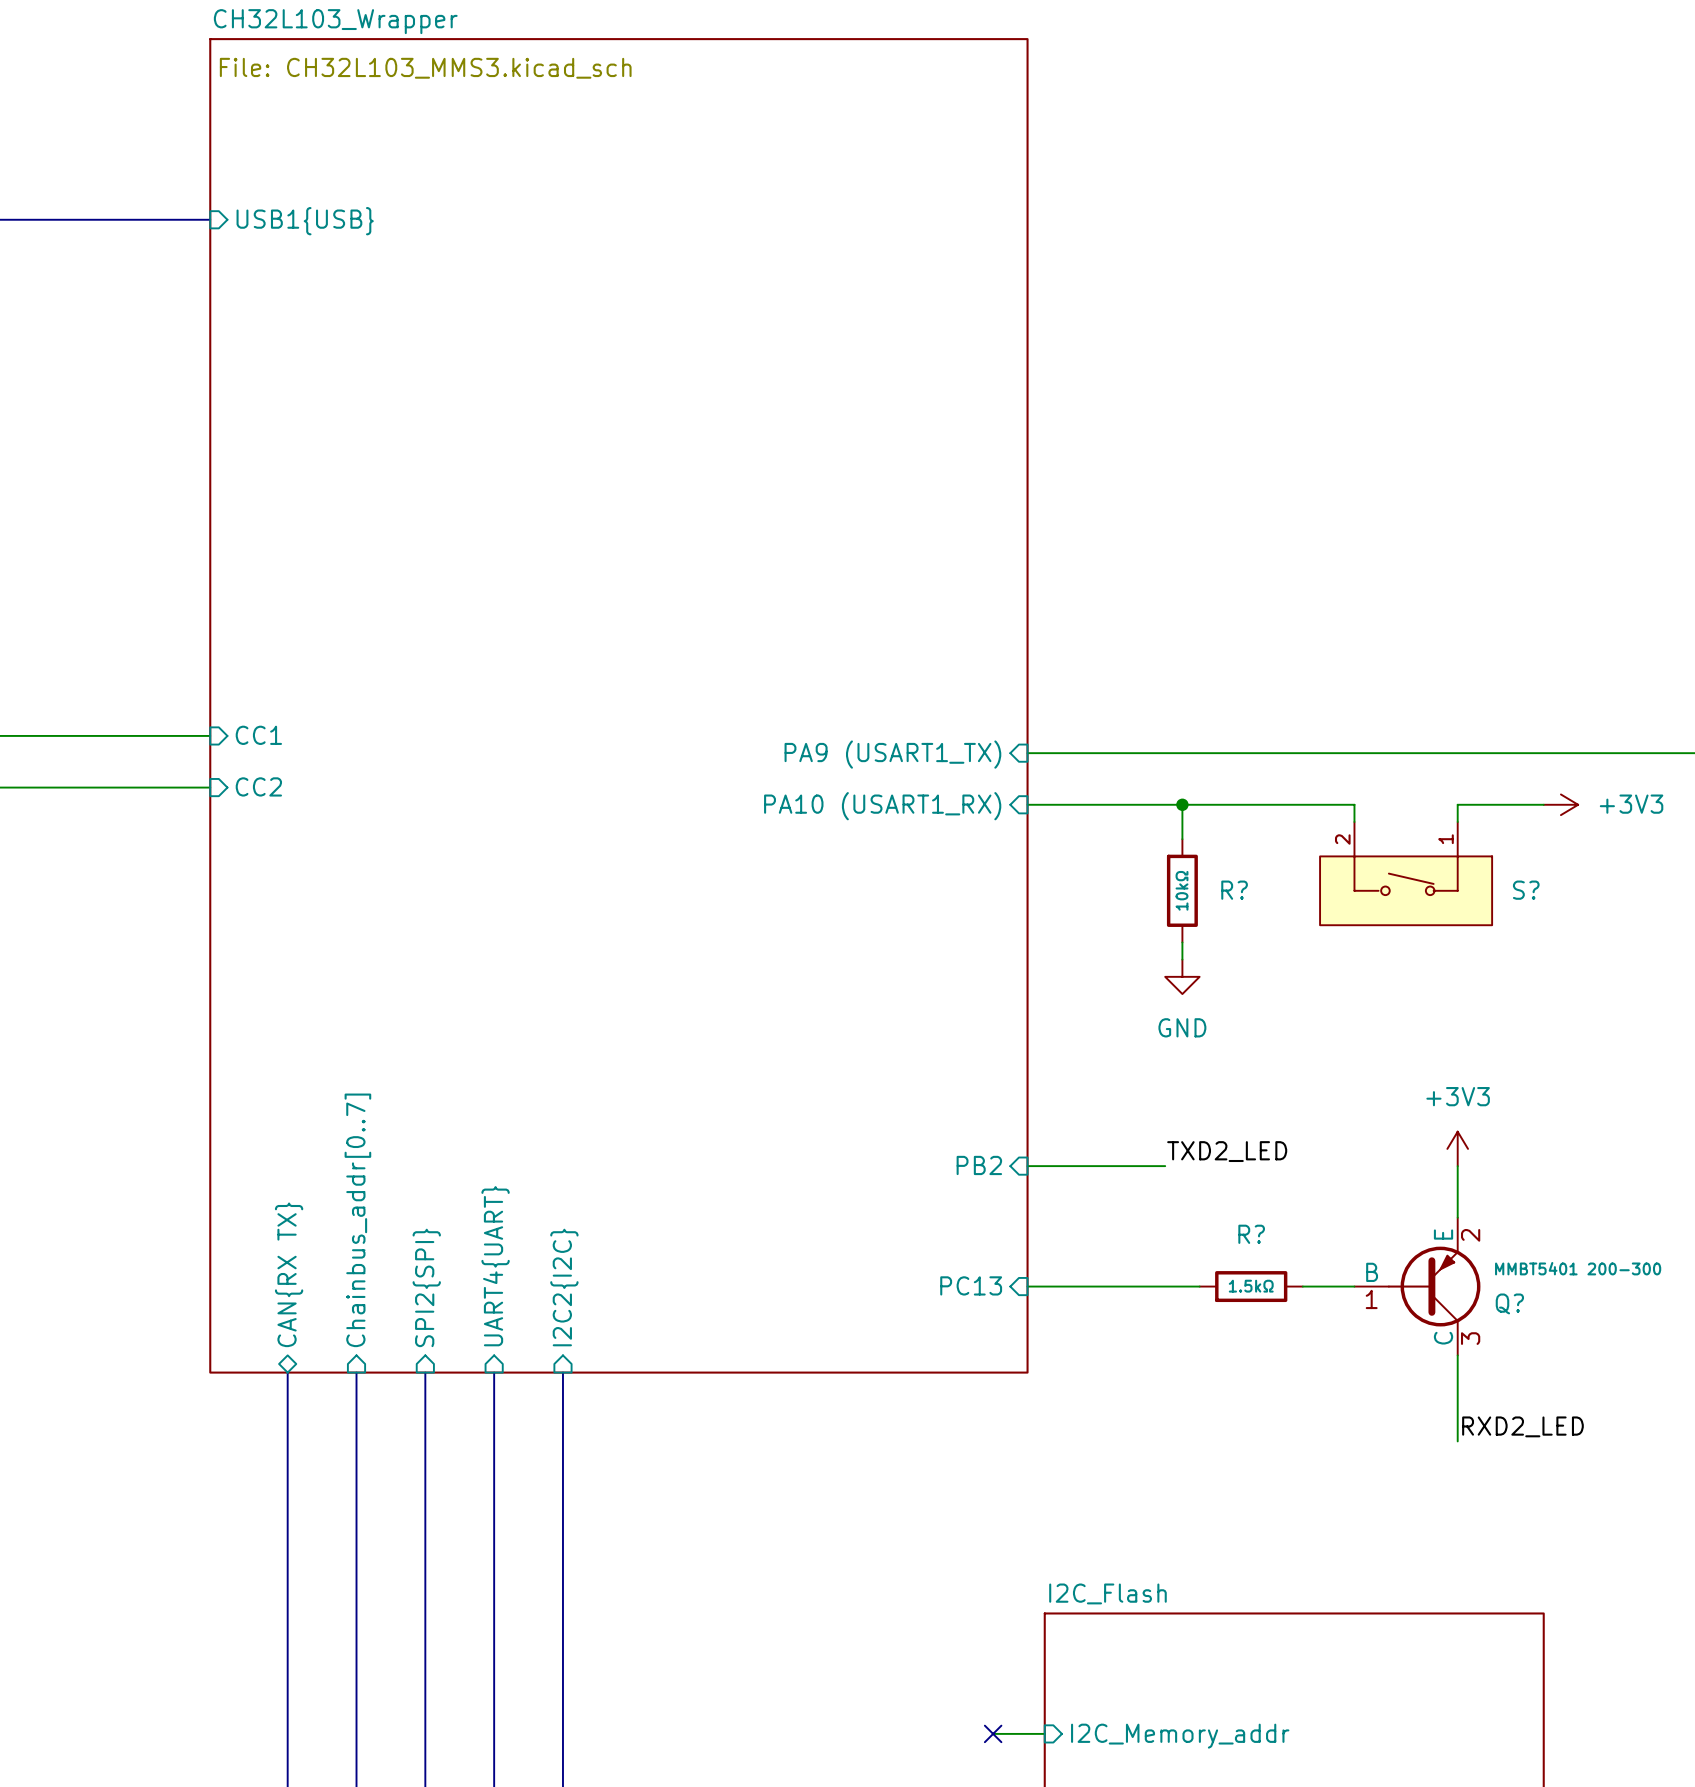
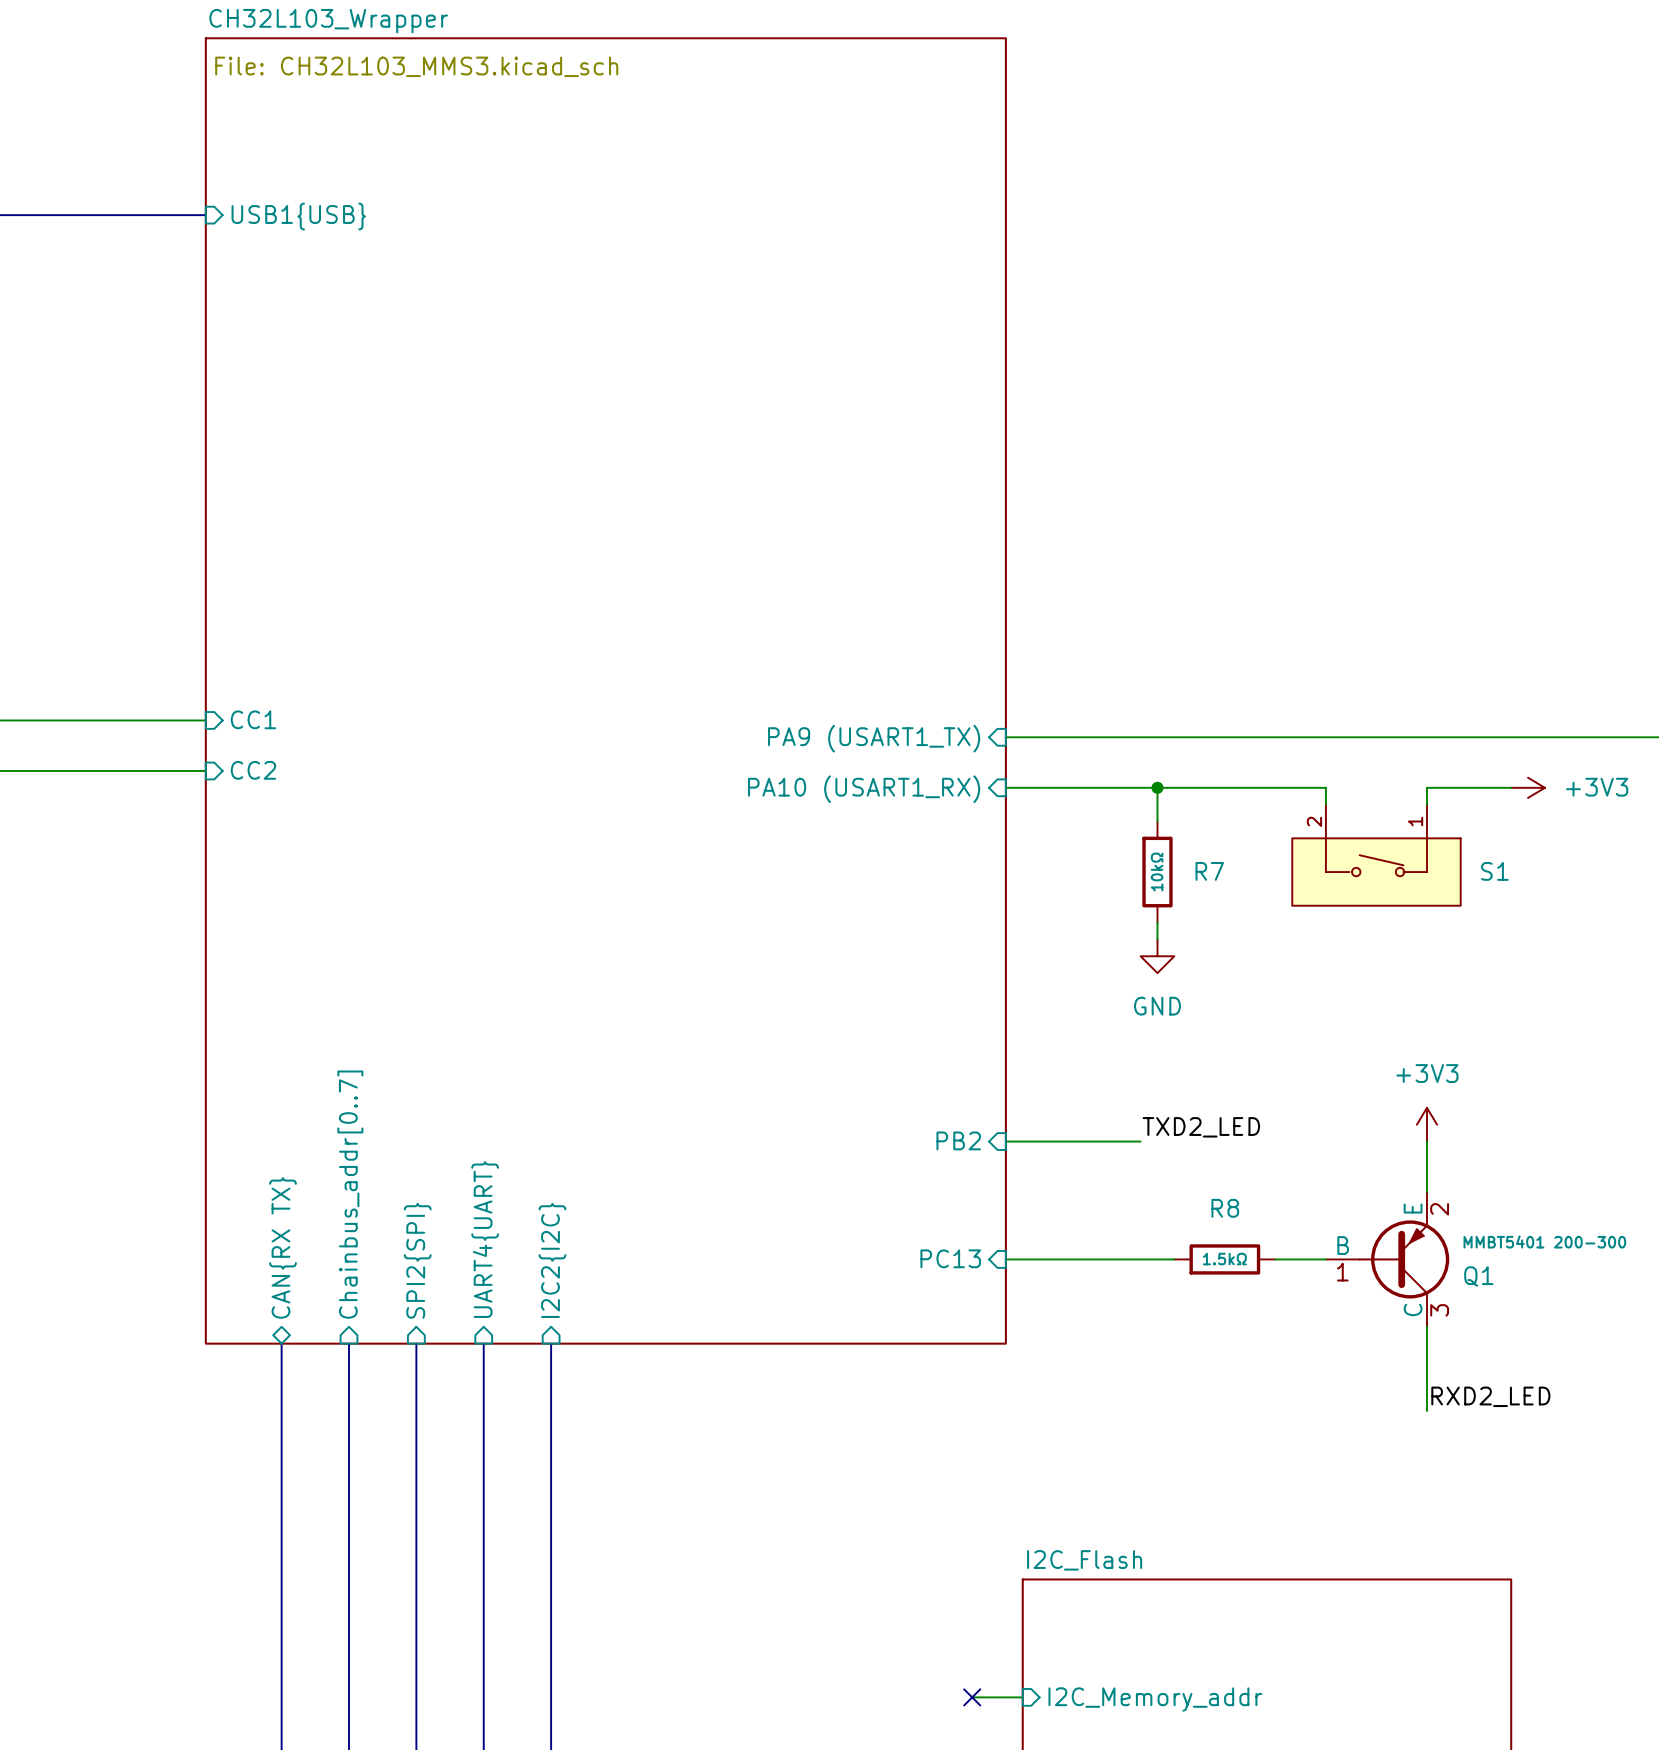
R? name: R? (1234, 890) -> R7 (1209, 871)
S? name: S? (1526, 890) -> S1 (1494, 871)
R? name: R? (1251, 1234) -> R8 (1225, 1208)
Q? name: Q? (1509, 1303) -> Q1 (1478, 1276)

